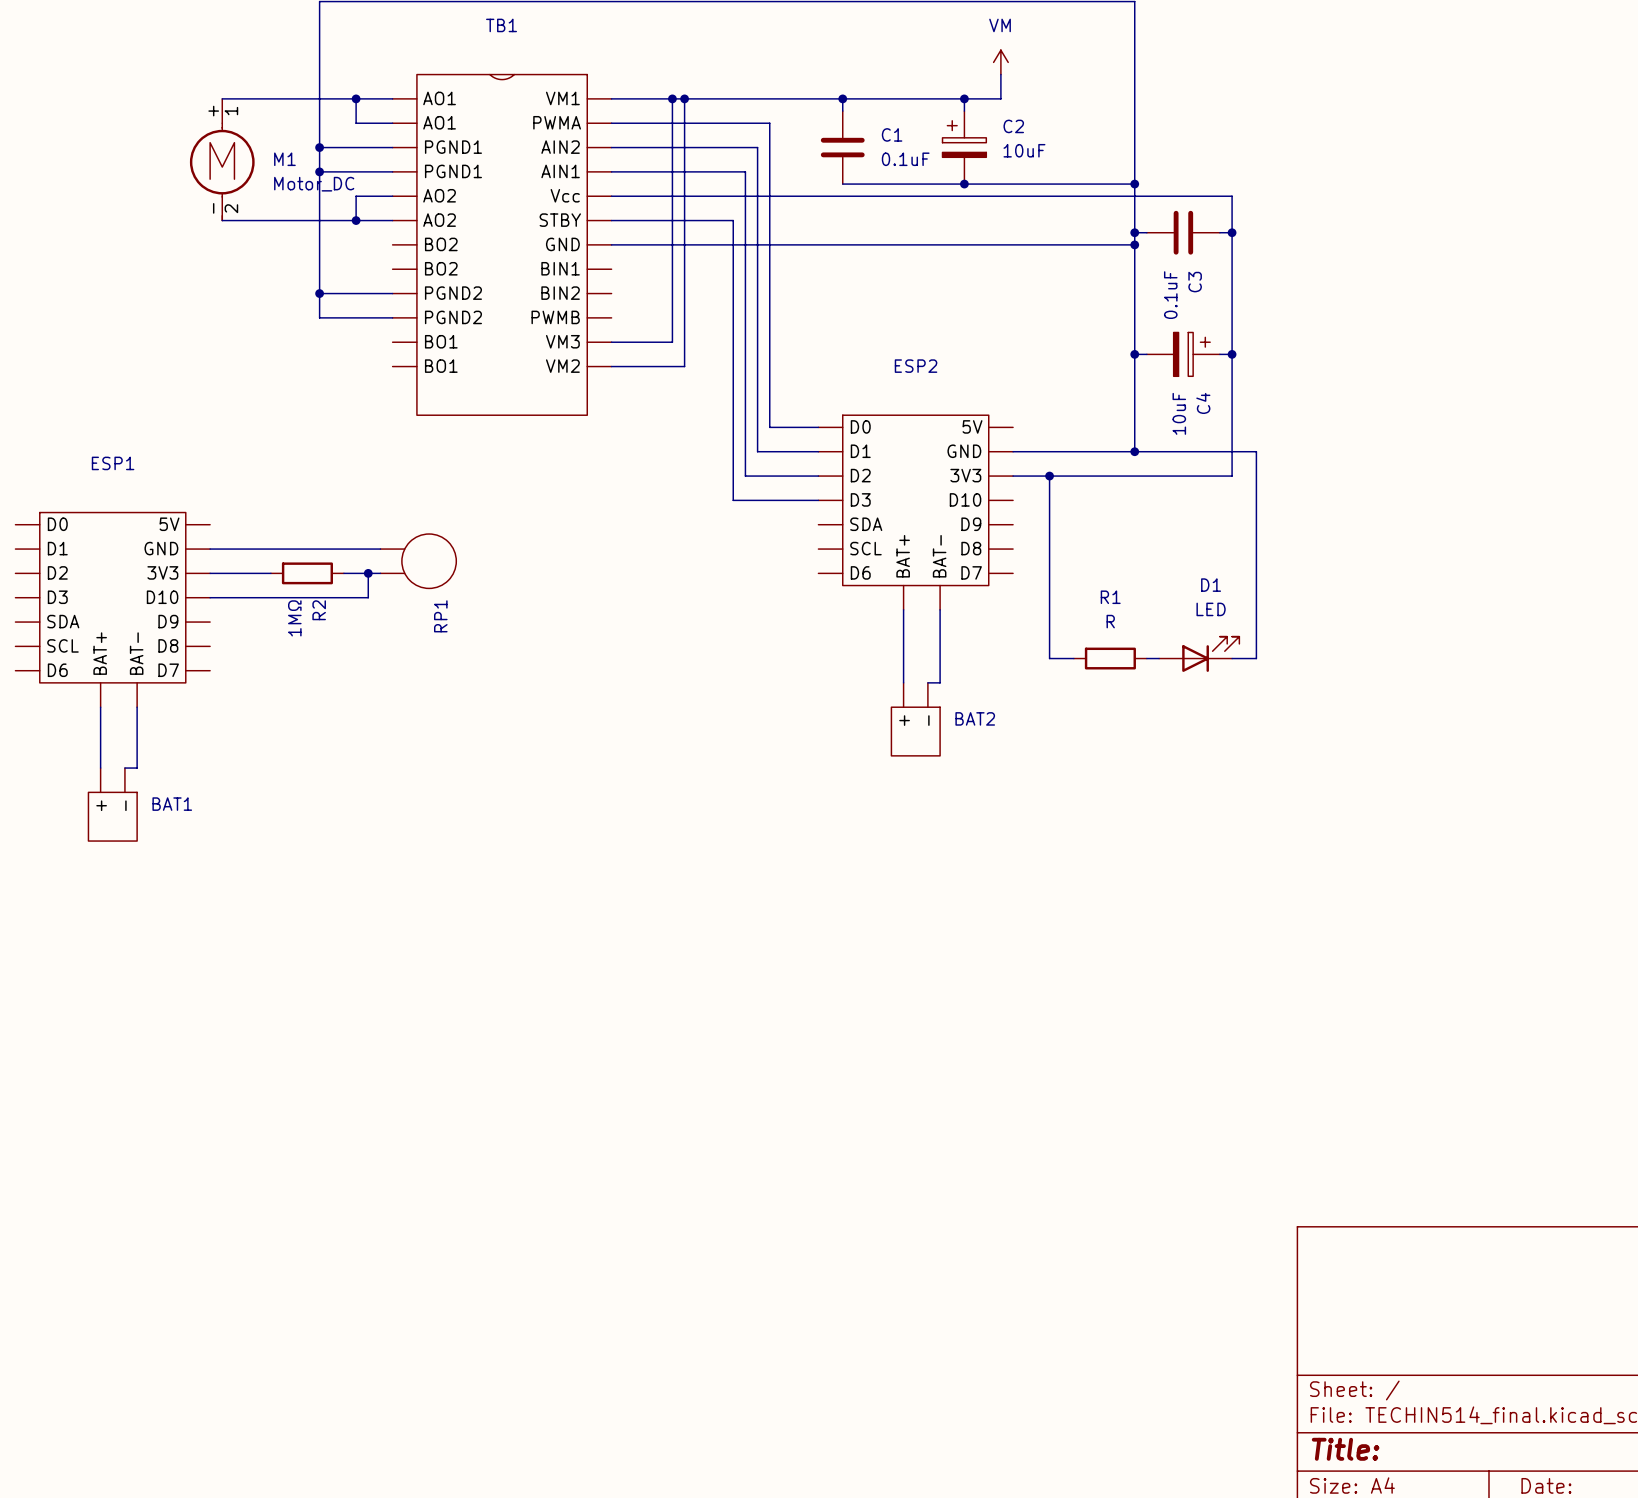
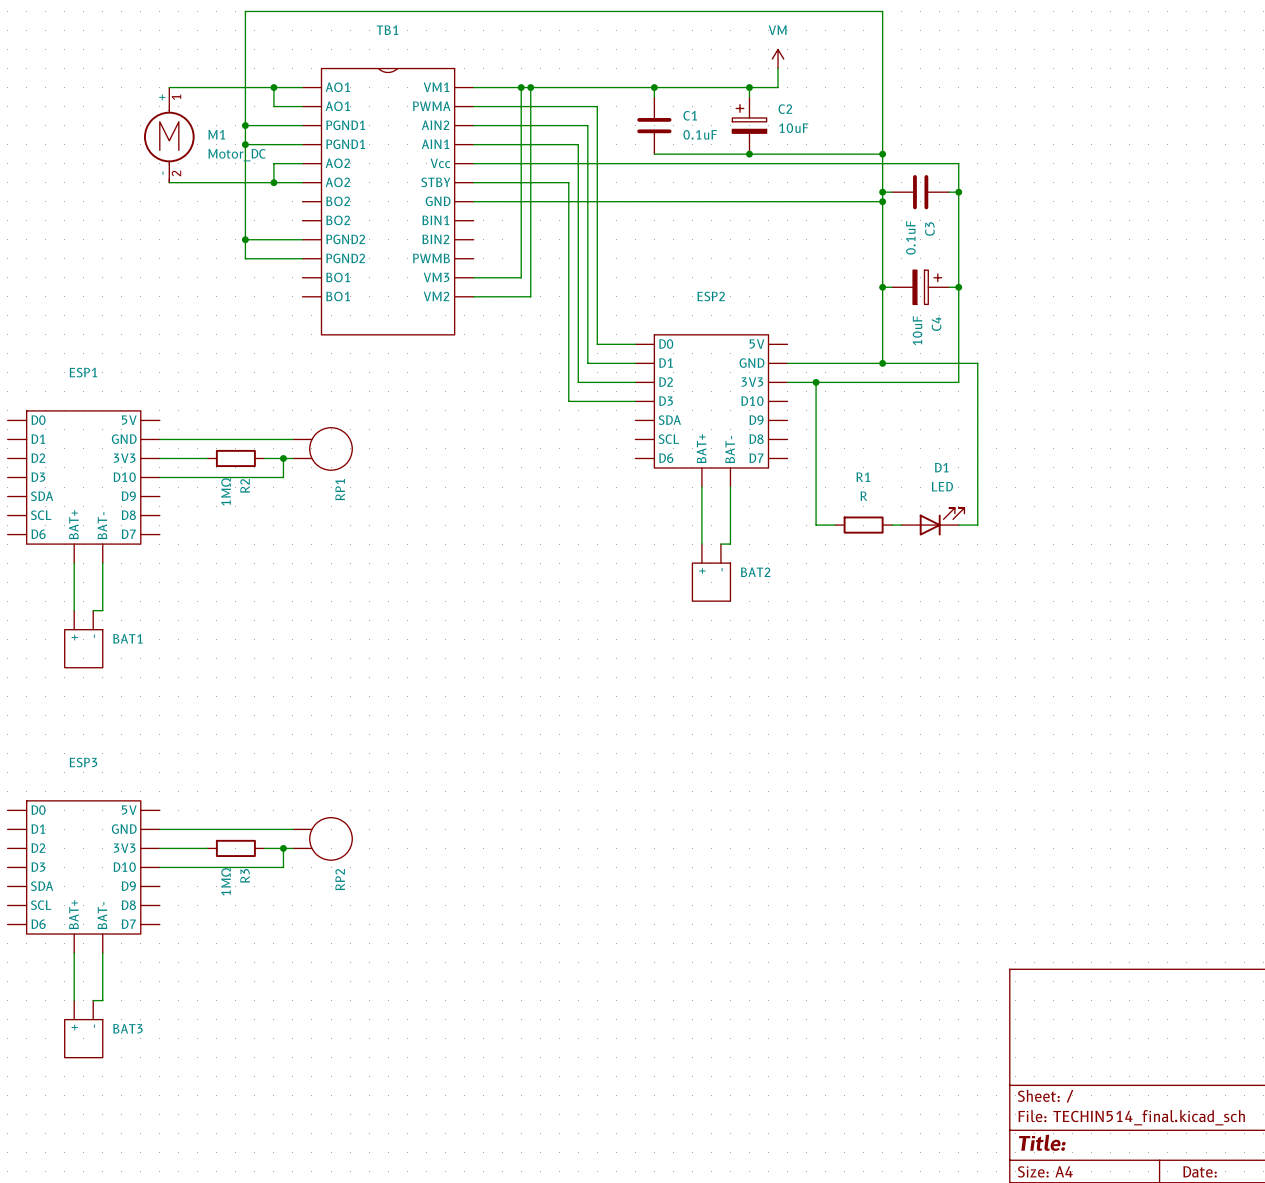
wire: none -> (159, 829) (292, 829)
RP2: none -> (322, 838)
wire: none -> (159, 848) (207, 848)
R3: none -> 1MΩ (235, 848)
wire: none -> (264, 848) (292, 848)
wire: none -> (283, 848) (283, 867) (159, 867)
junction: none -> (283, 848)
ESP3: none -> (83, 876)
wire: none -> (74, 953) (74, 1000)
wire: none -> (102, 953) (102, 1000) (93, 1000)
BAT3: none -> (83, 1029)

